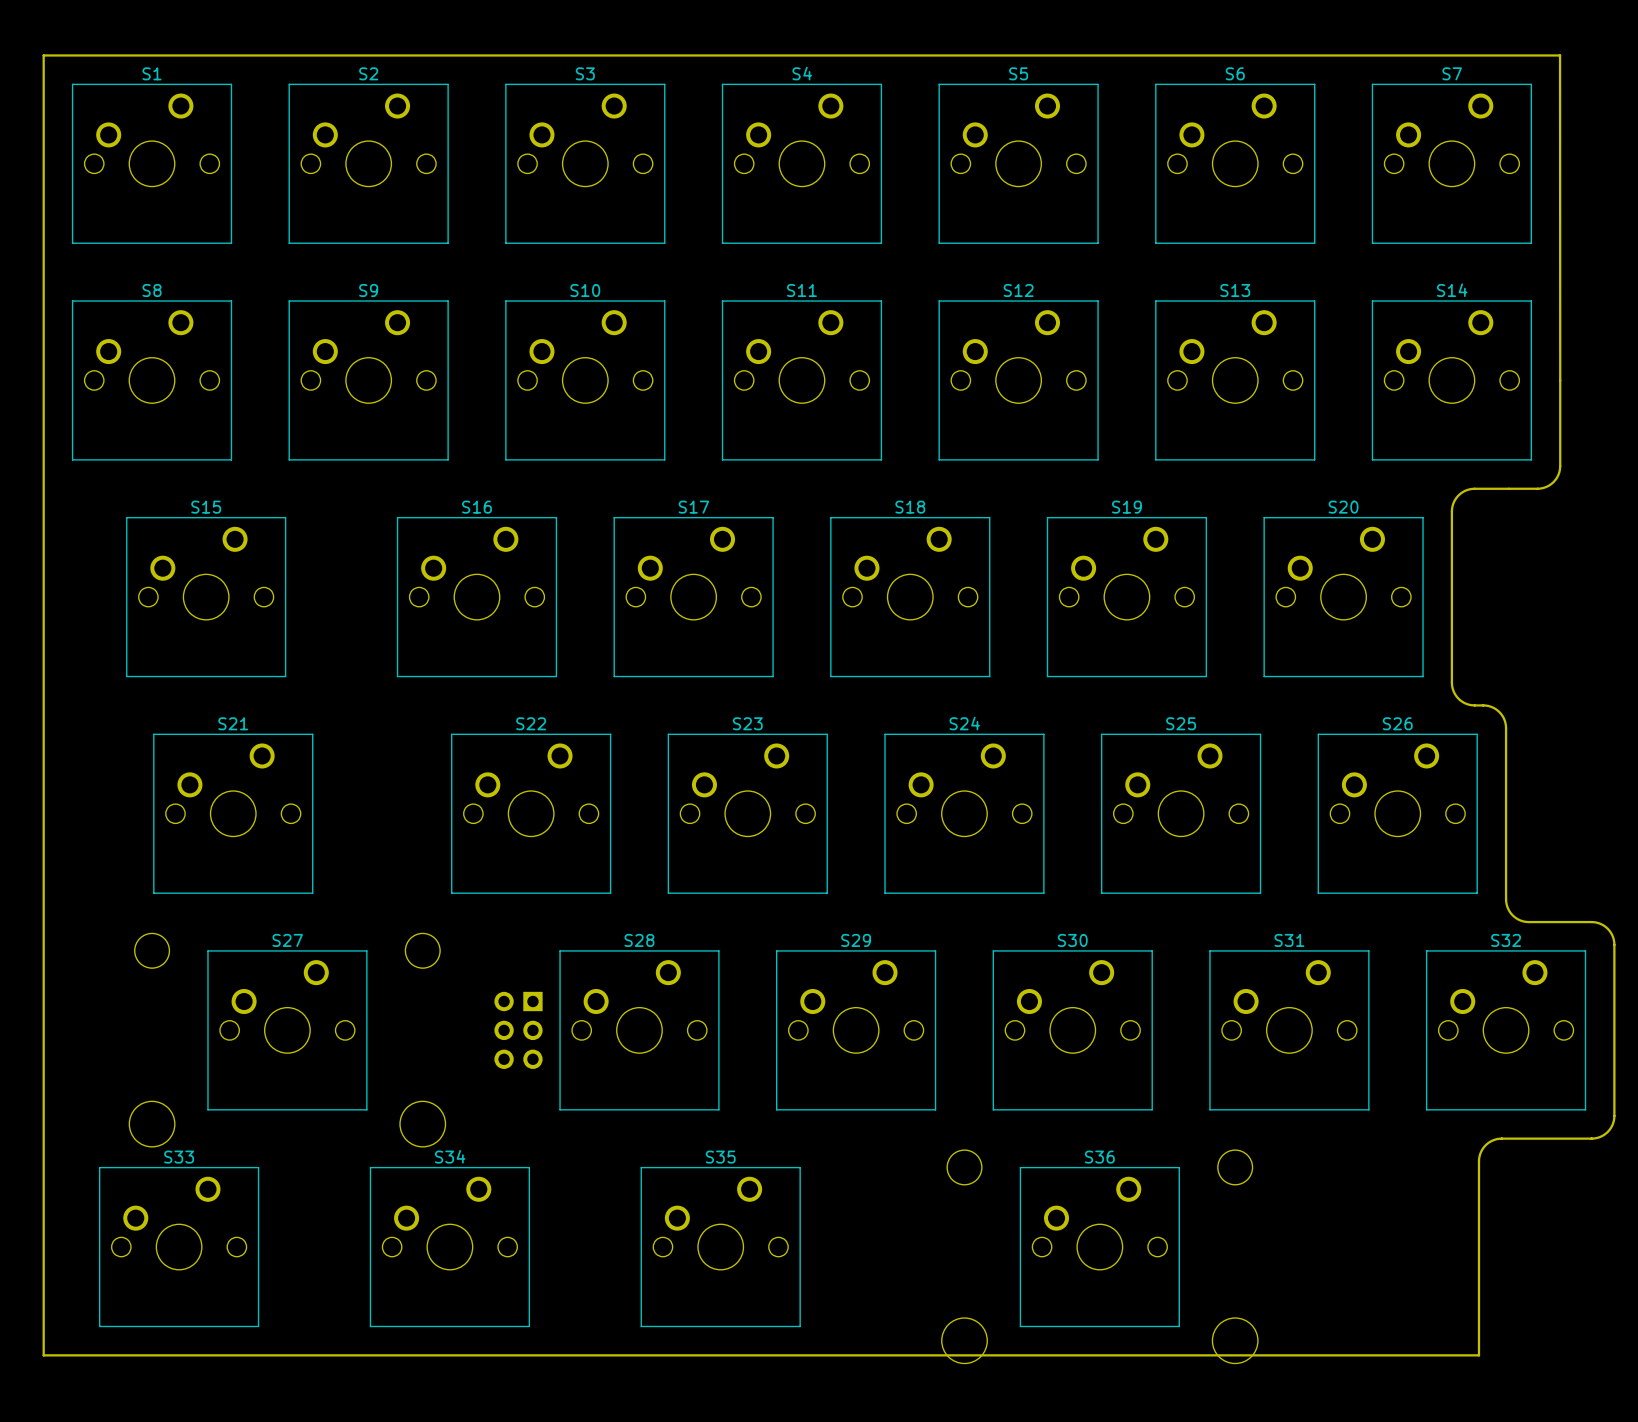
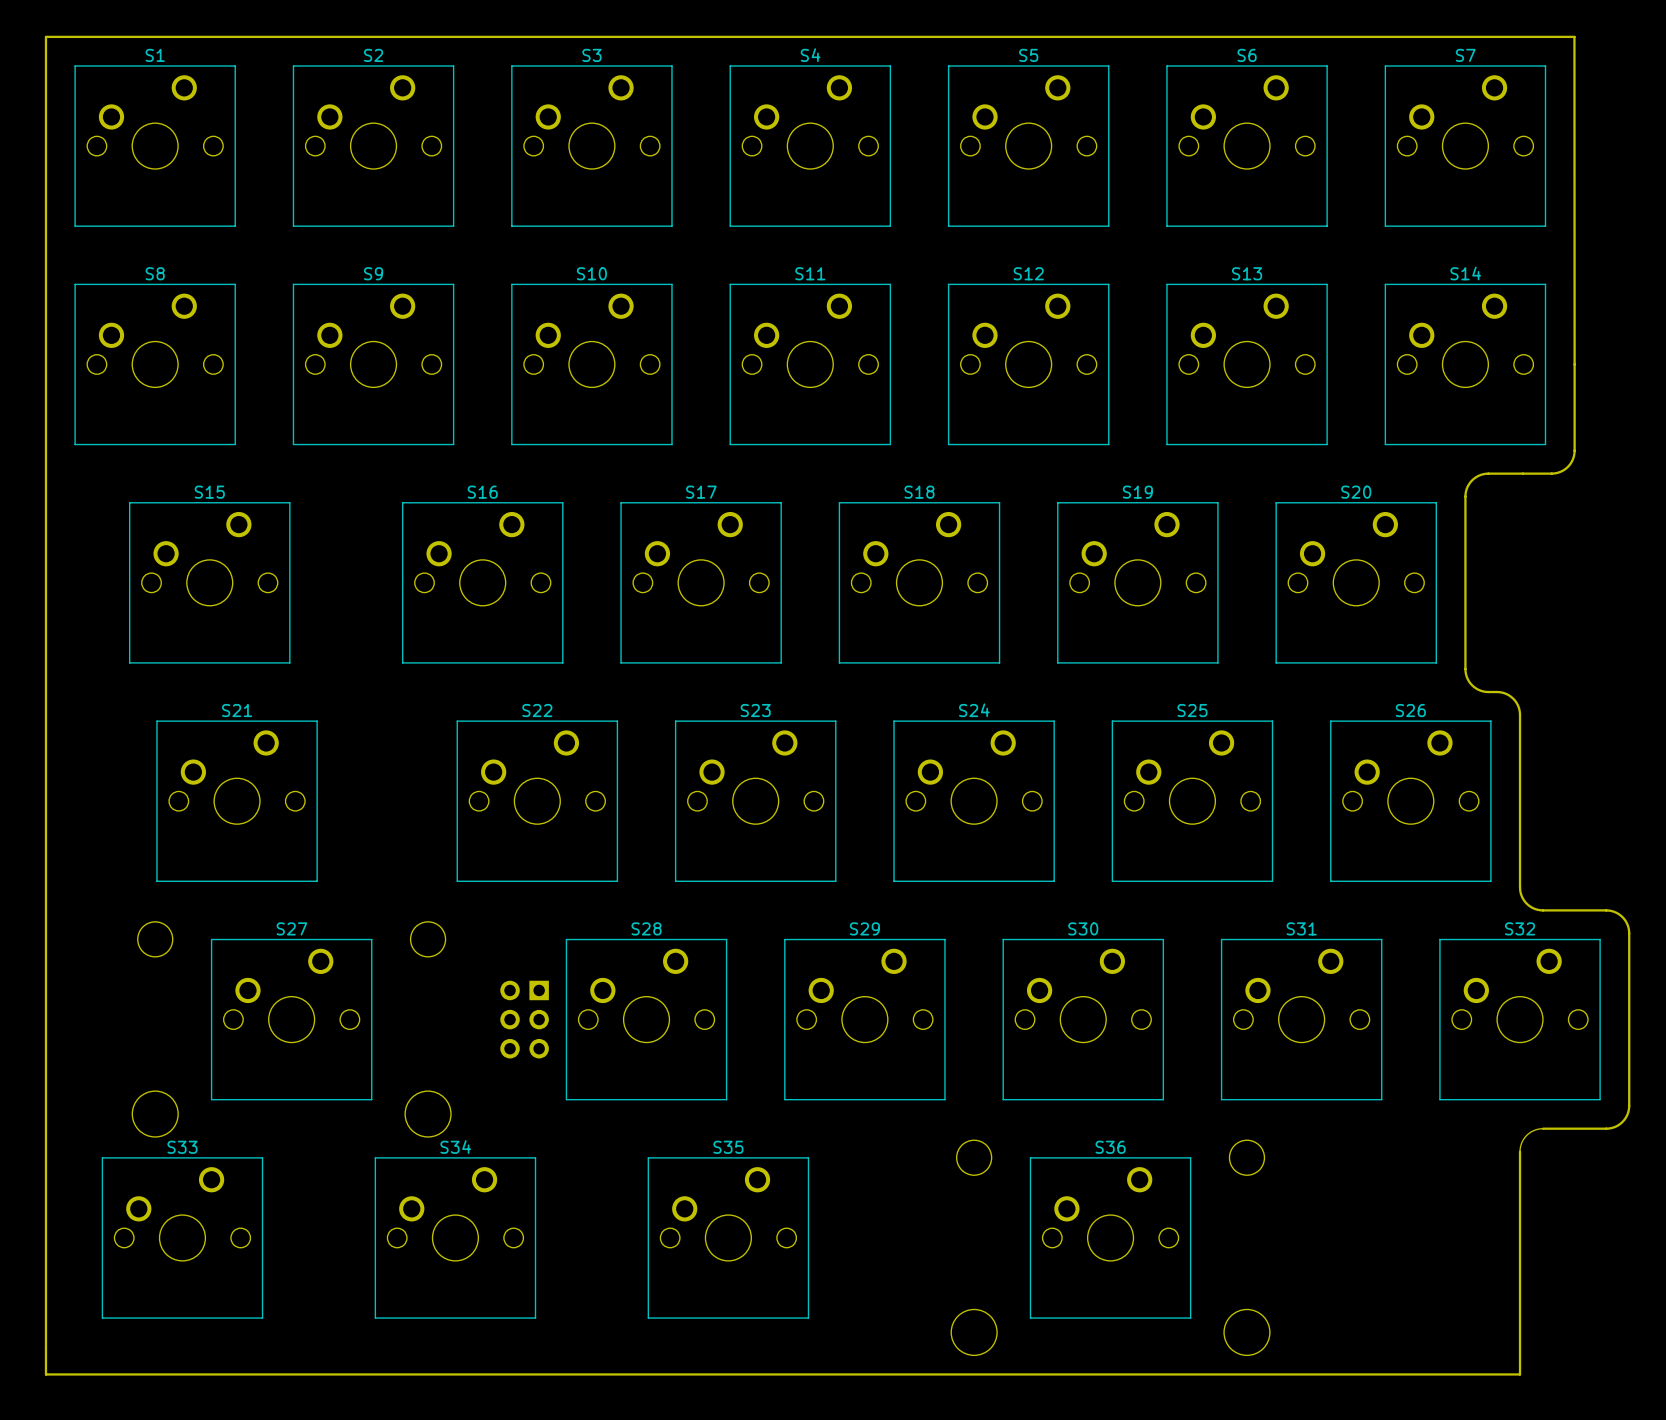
board edge: (1528, 1138) (1494, 1139) (1483, 1147) (1479, 1156) (1478, 1355) (43, 1355) -> (1542, 1128) (1533, 1130) (1526, 1135) (1520, 1149) (1520, 1374) (45, 1374) (45, 1347)

